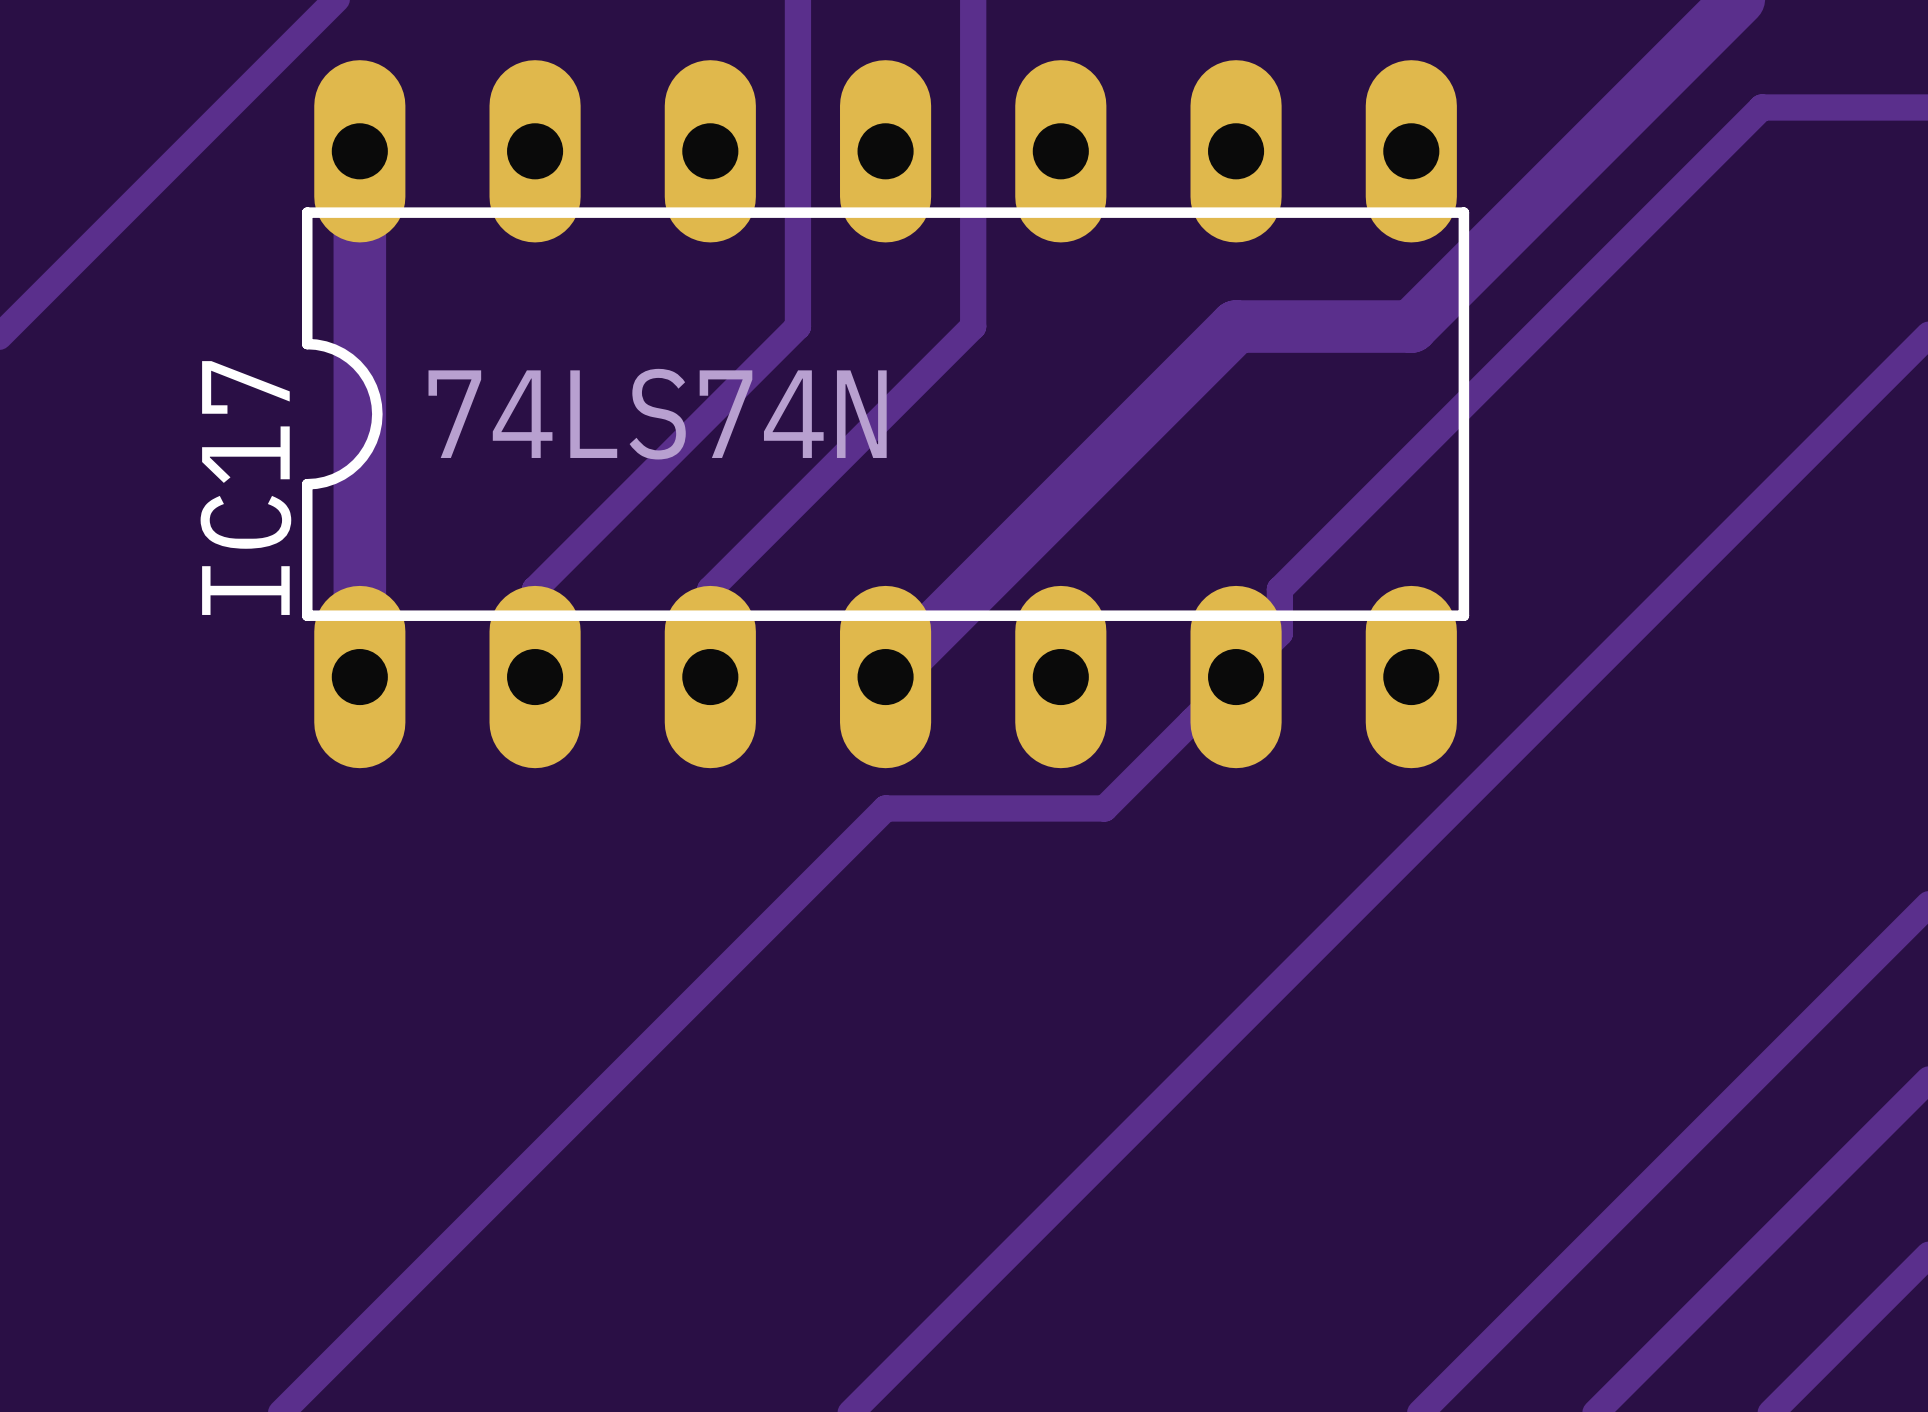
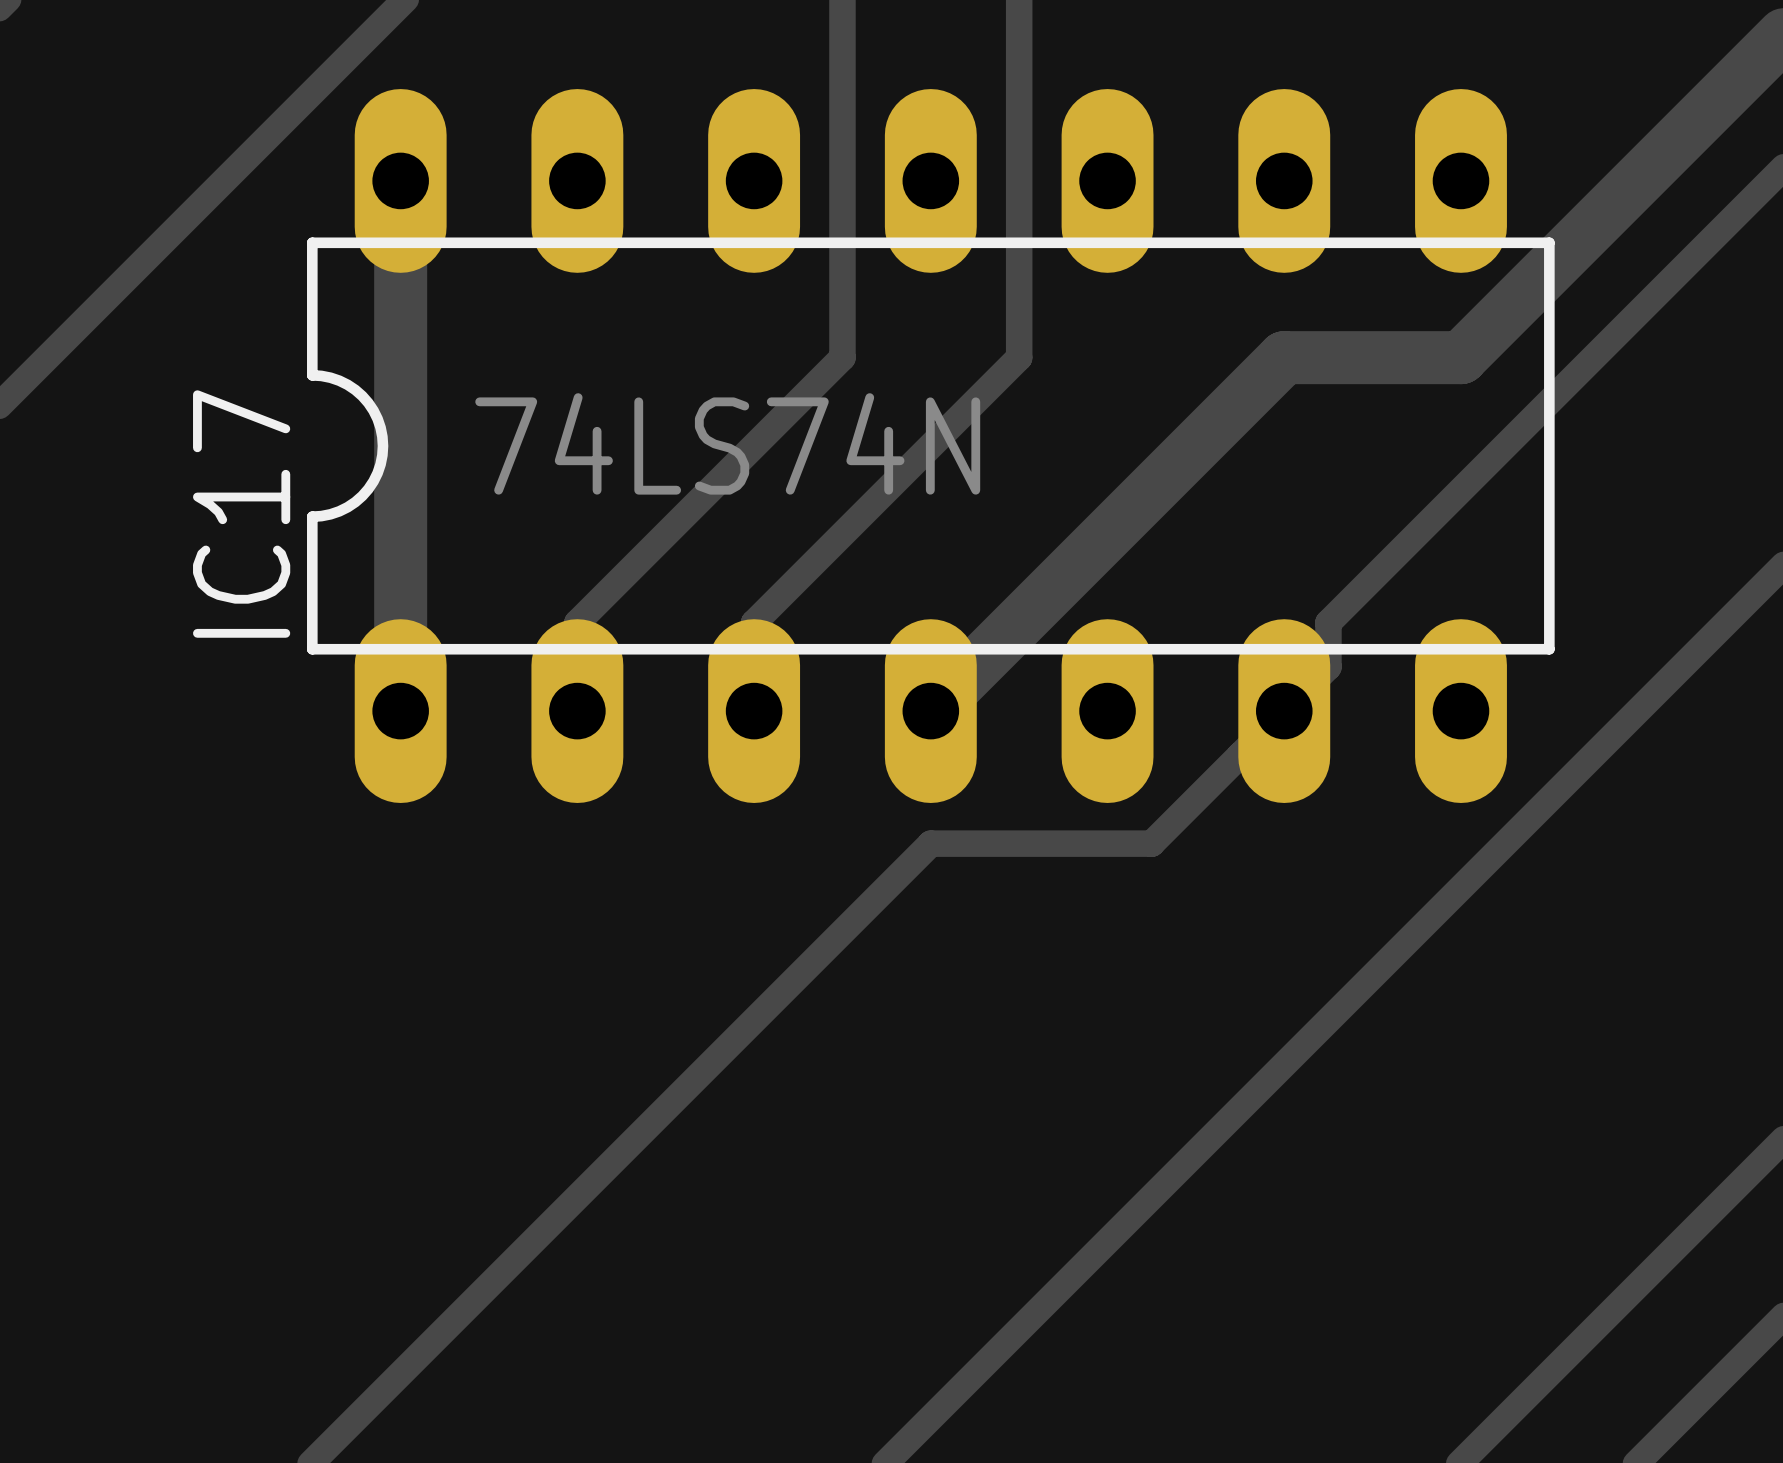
IC17 footprint: [301, 60, 1470, 769] -> [307, 89, 1555, 803]
IC17 name position: IC17 (245, 488) -> IC17 (241, 514)

